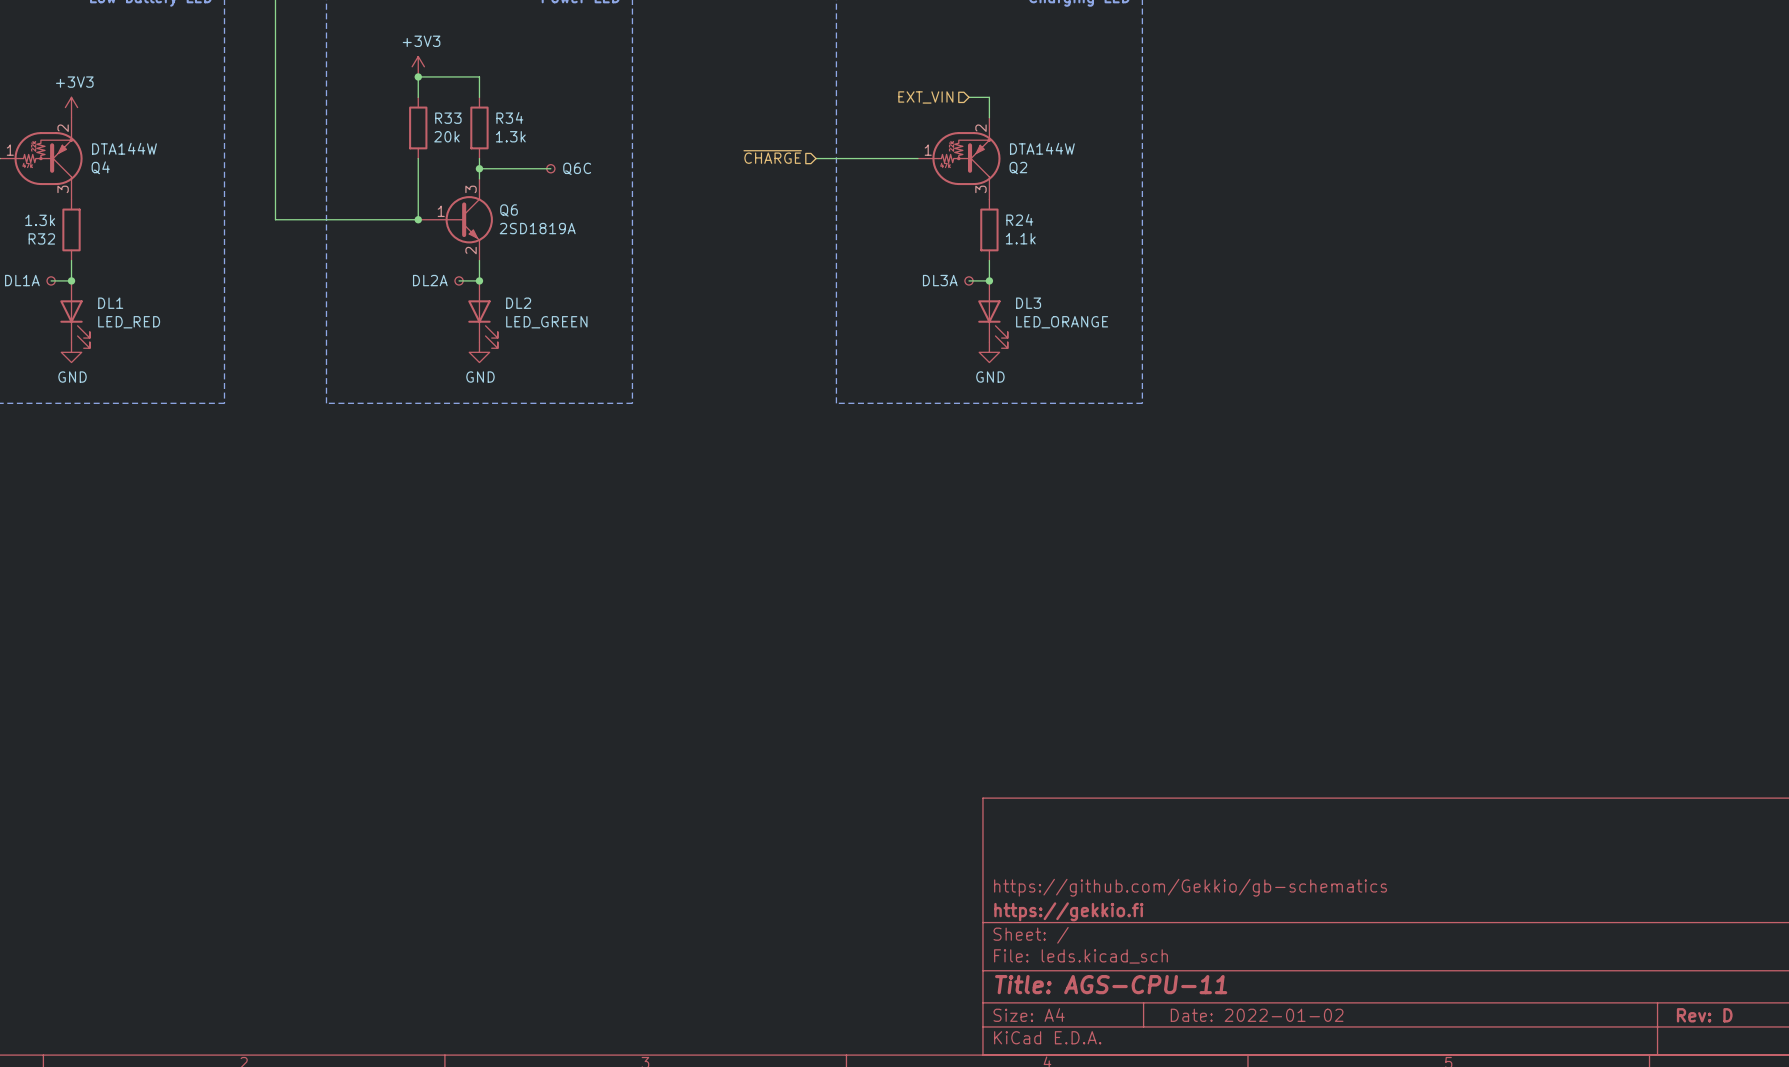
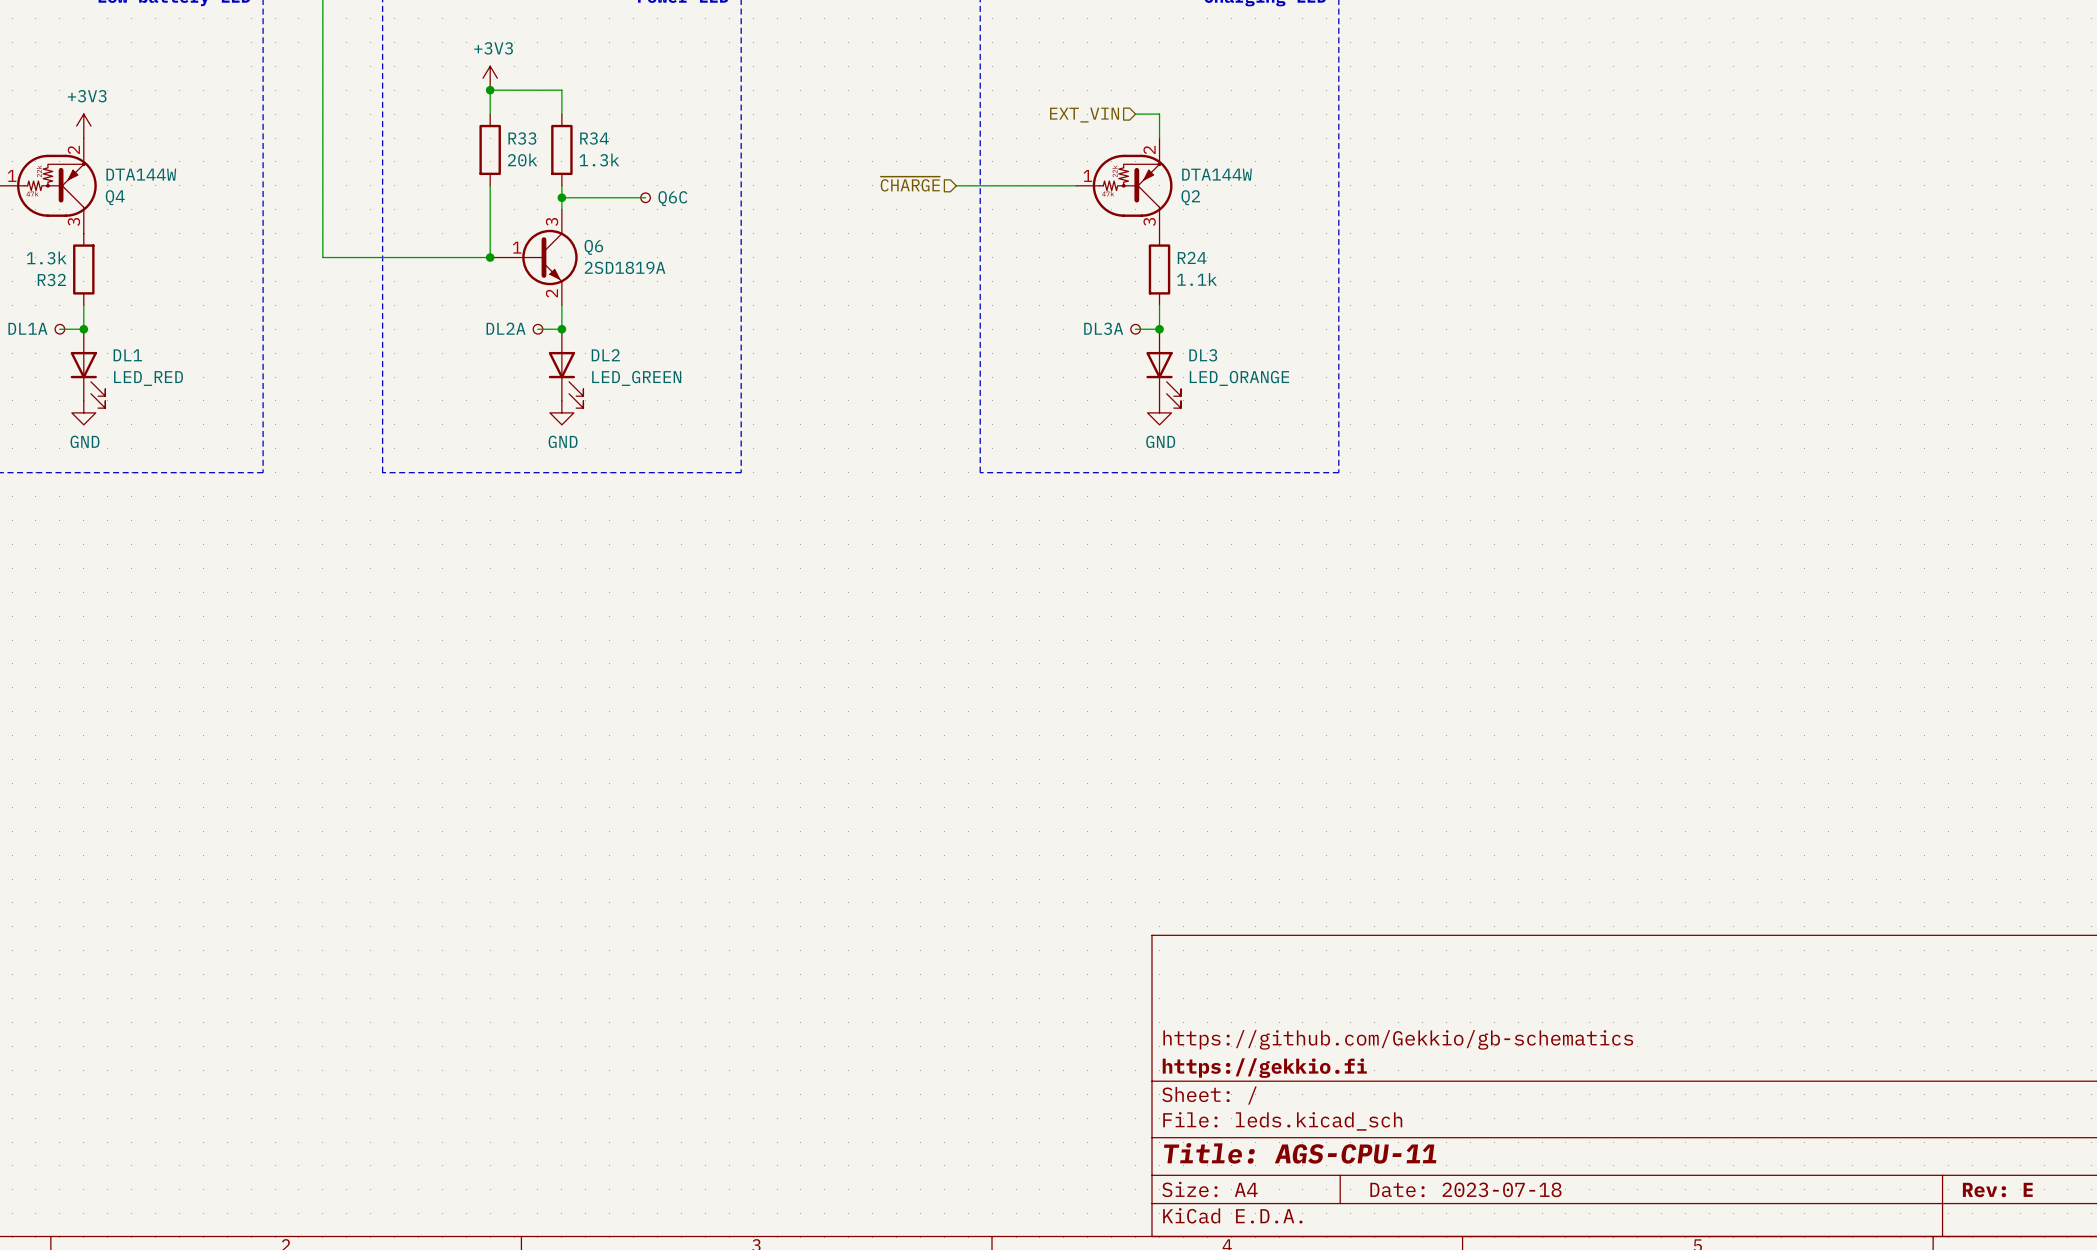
title block: Date: 2022-01-02 (1257, 1015) -> Date: 2023-07-18 (1465, 1189)
title block: Rev: D (1704, 1015) -> Rev: E (1997, 1189)

